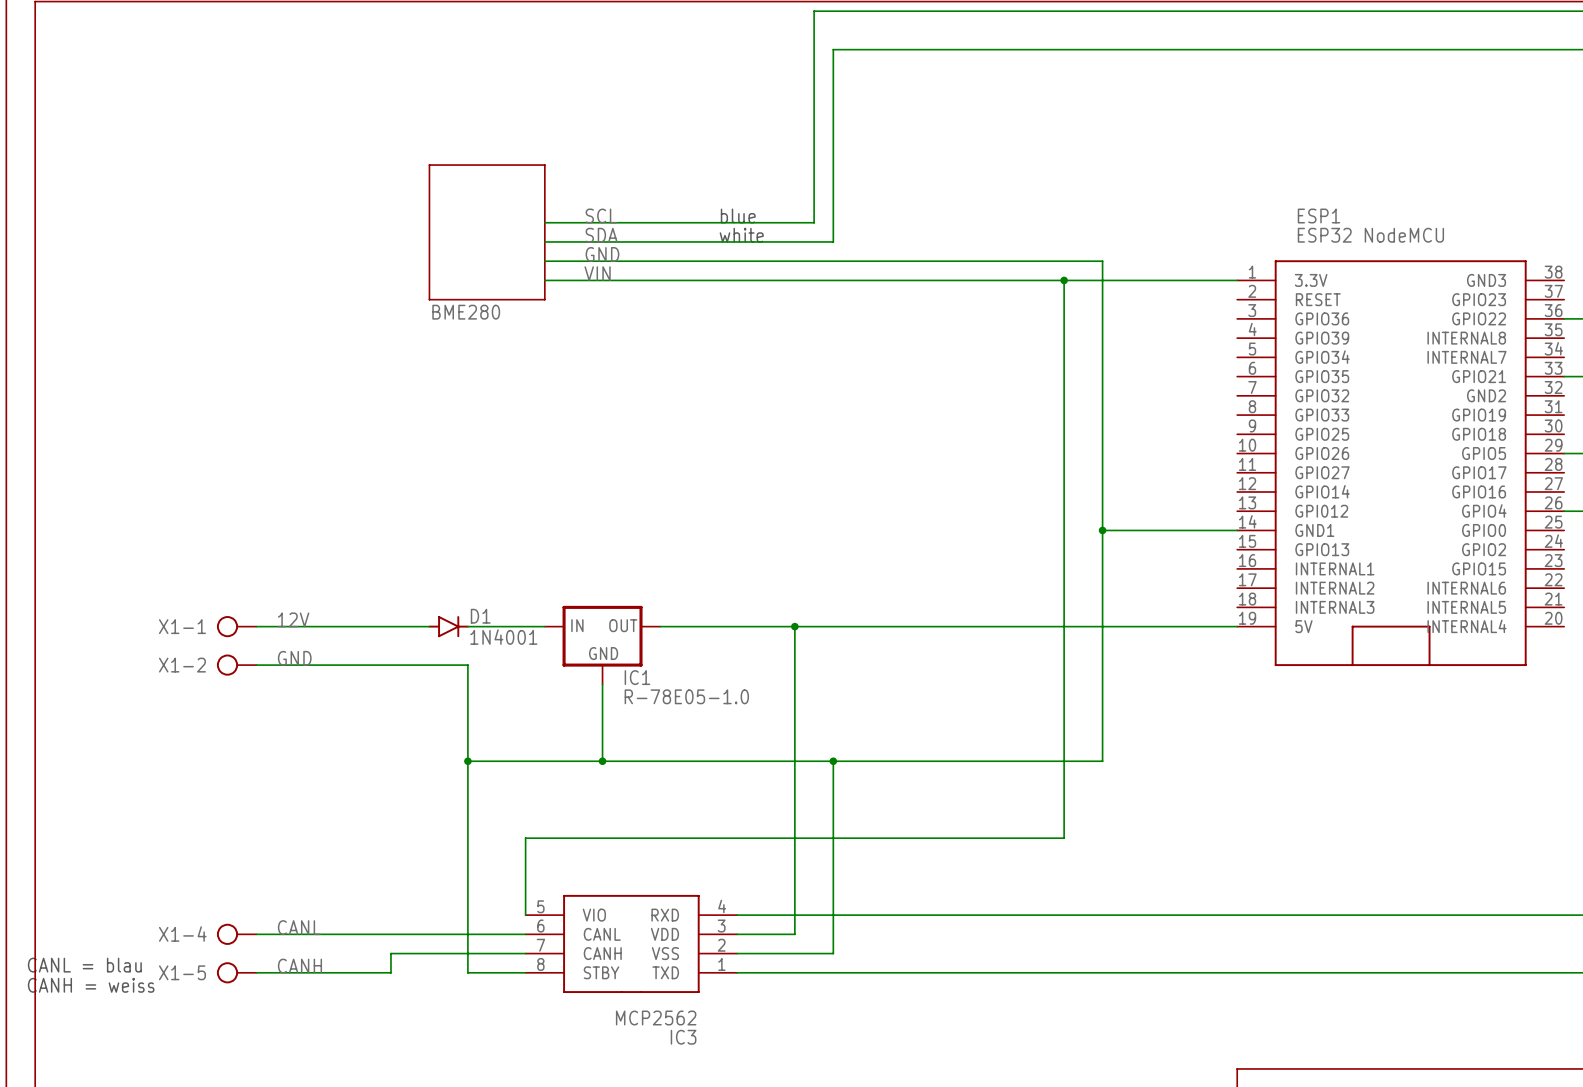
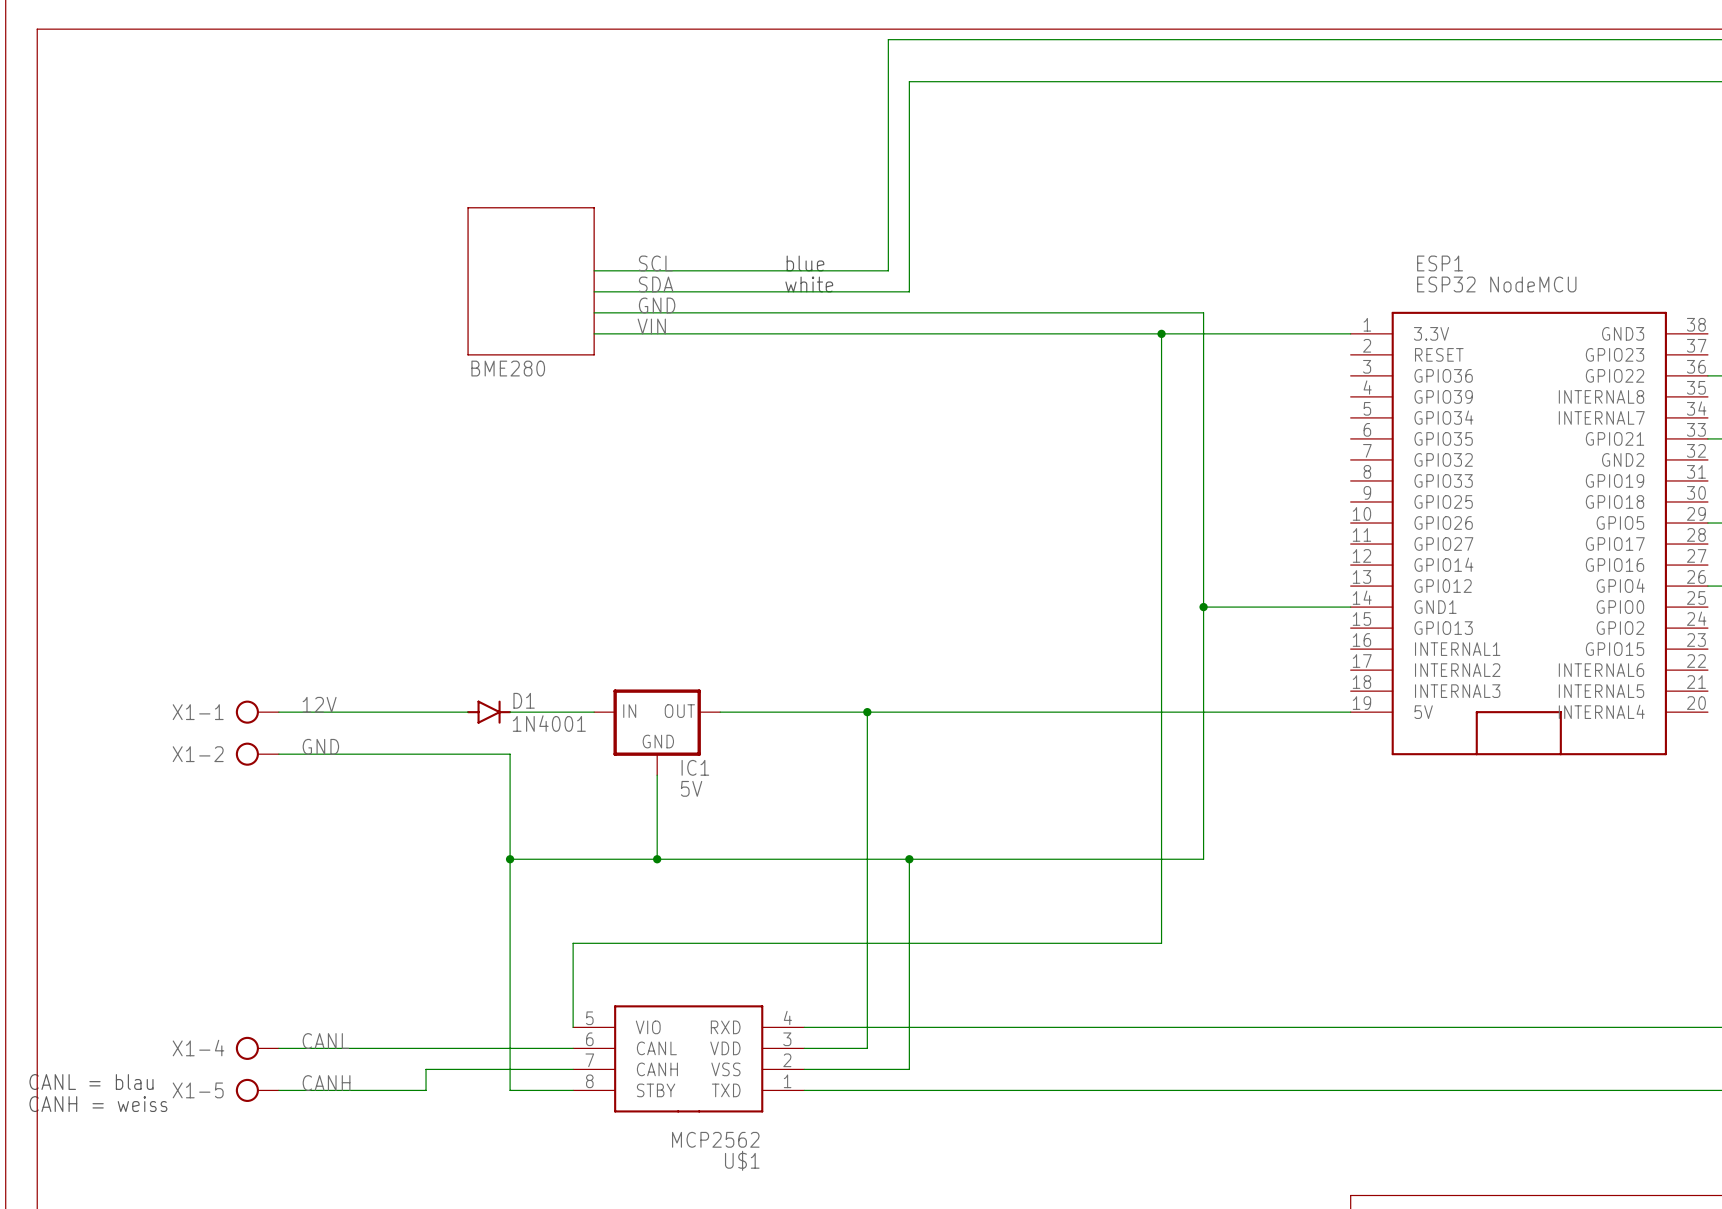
IC1 value: R-78E05-1.0 (686, 696) -> 5V (691, 788)
IC3 name: IC3 (683, 1037) -> U$1 (742, 1160)

